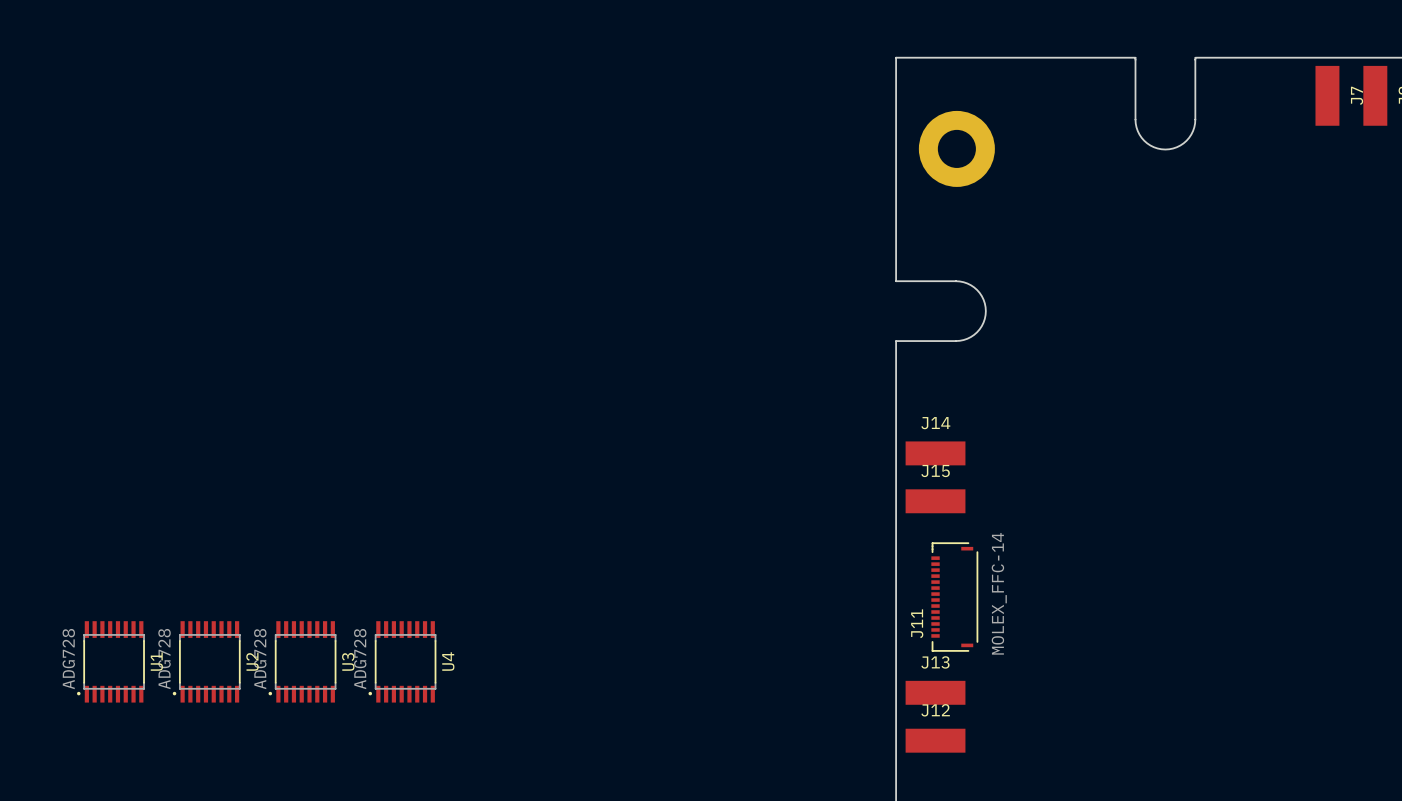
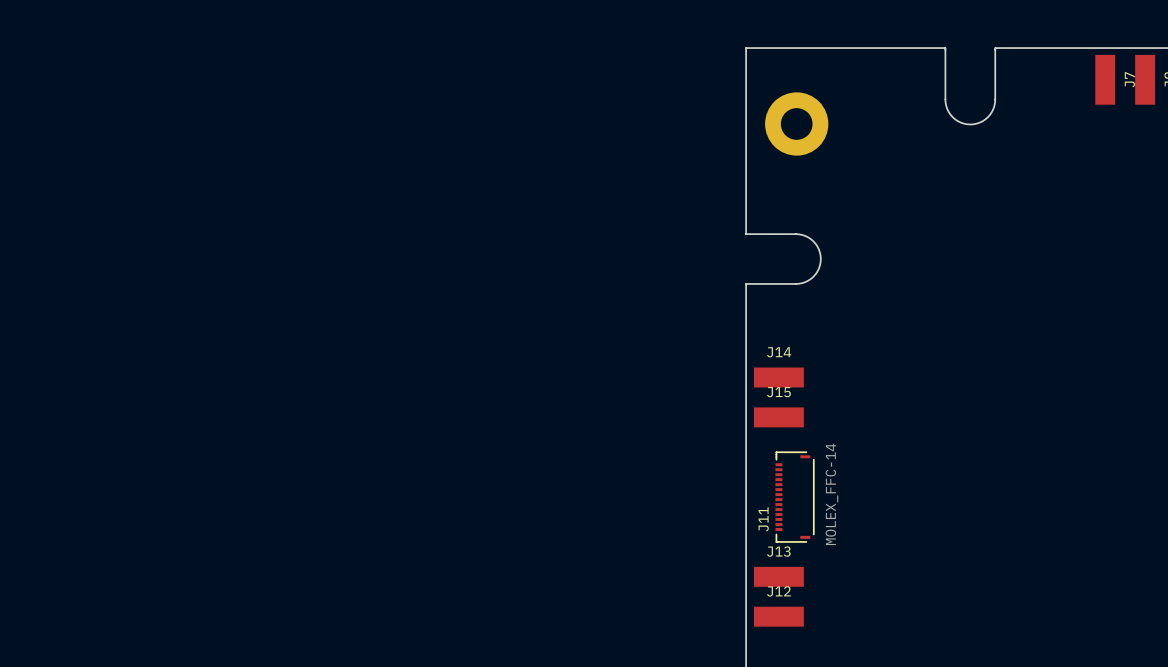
U1: ADG728 (110, 661) -> none
U2: ADG728 (206, 661) -> none
U3: ADG728 (302, 661) -> none
U4: ADG728 (402, 661) -> none

